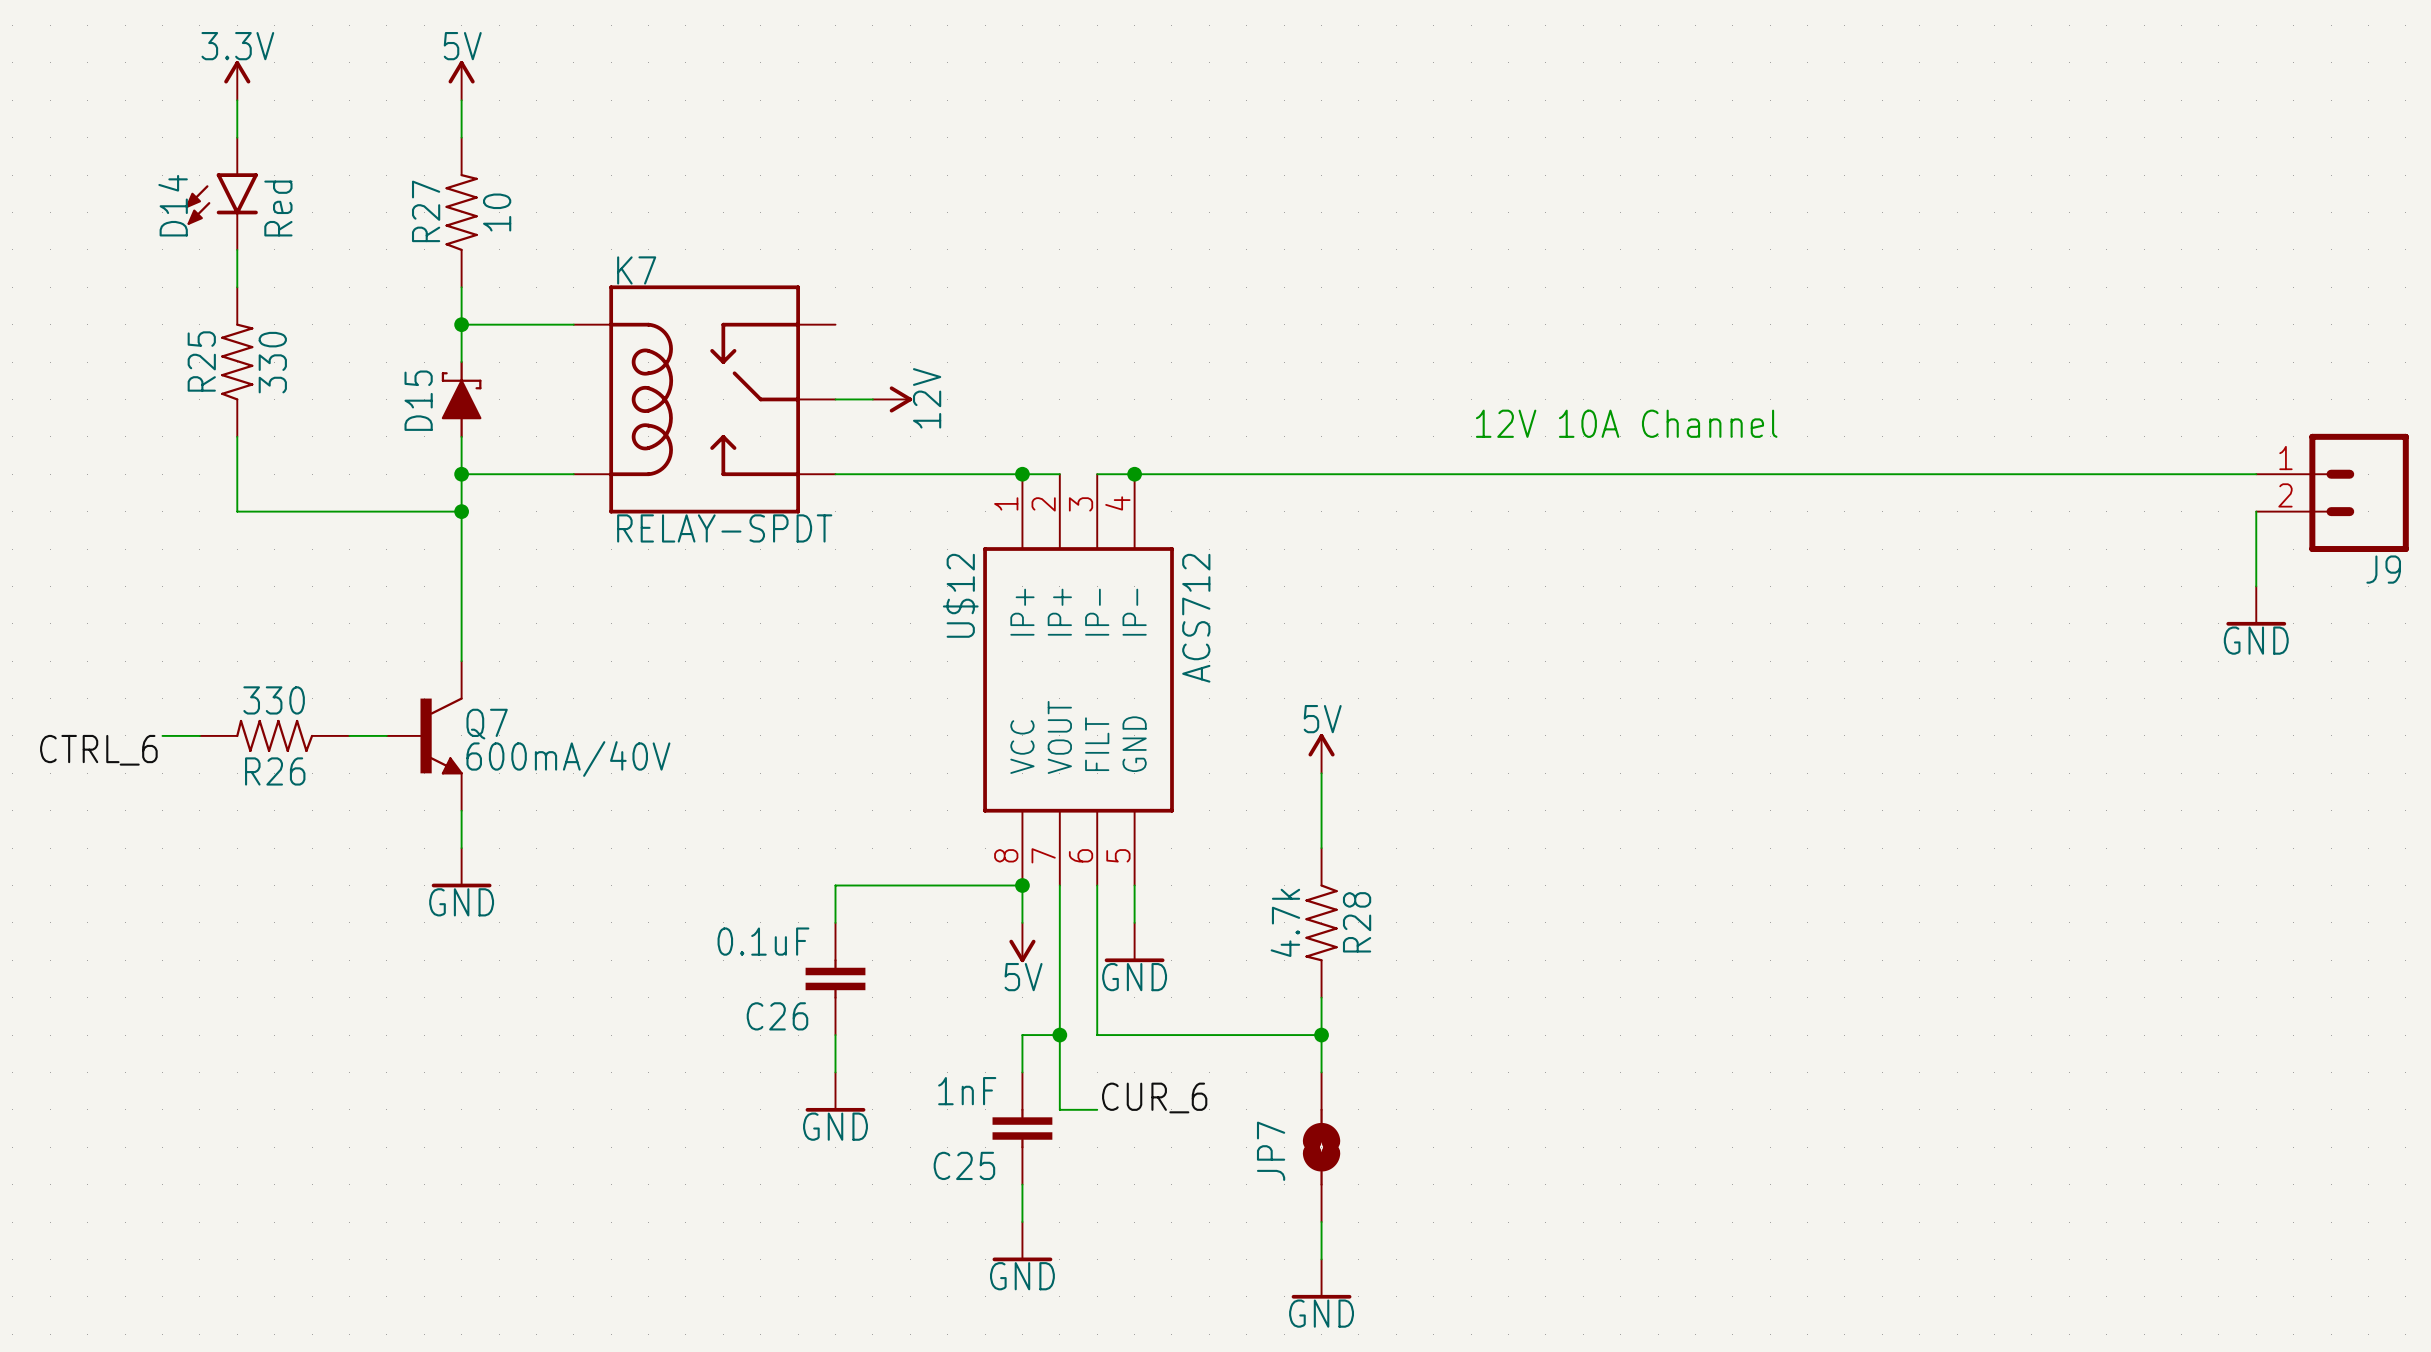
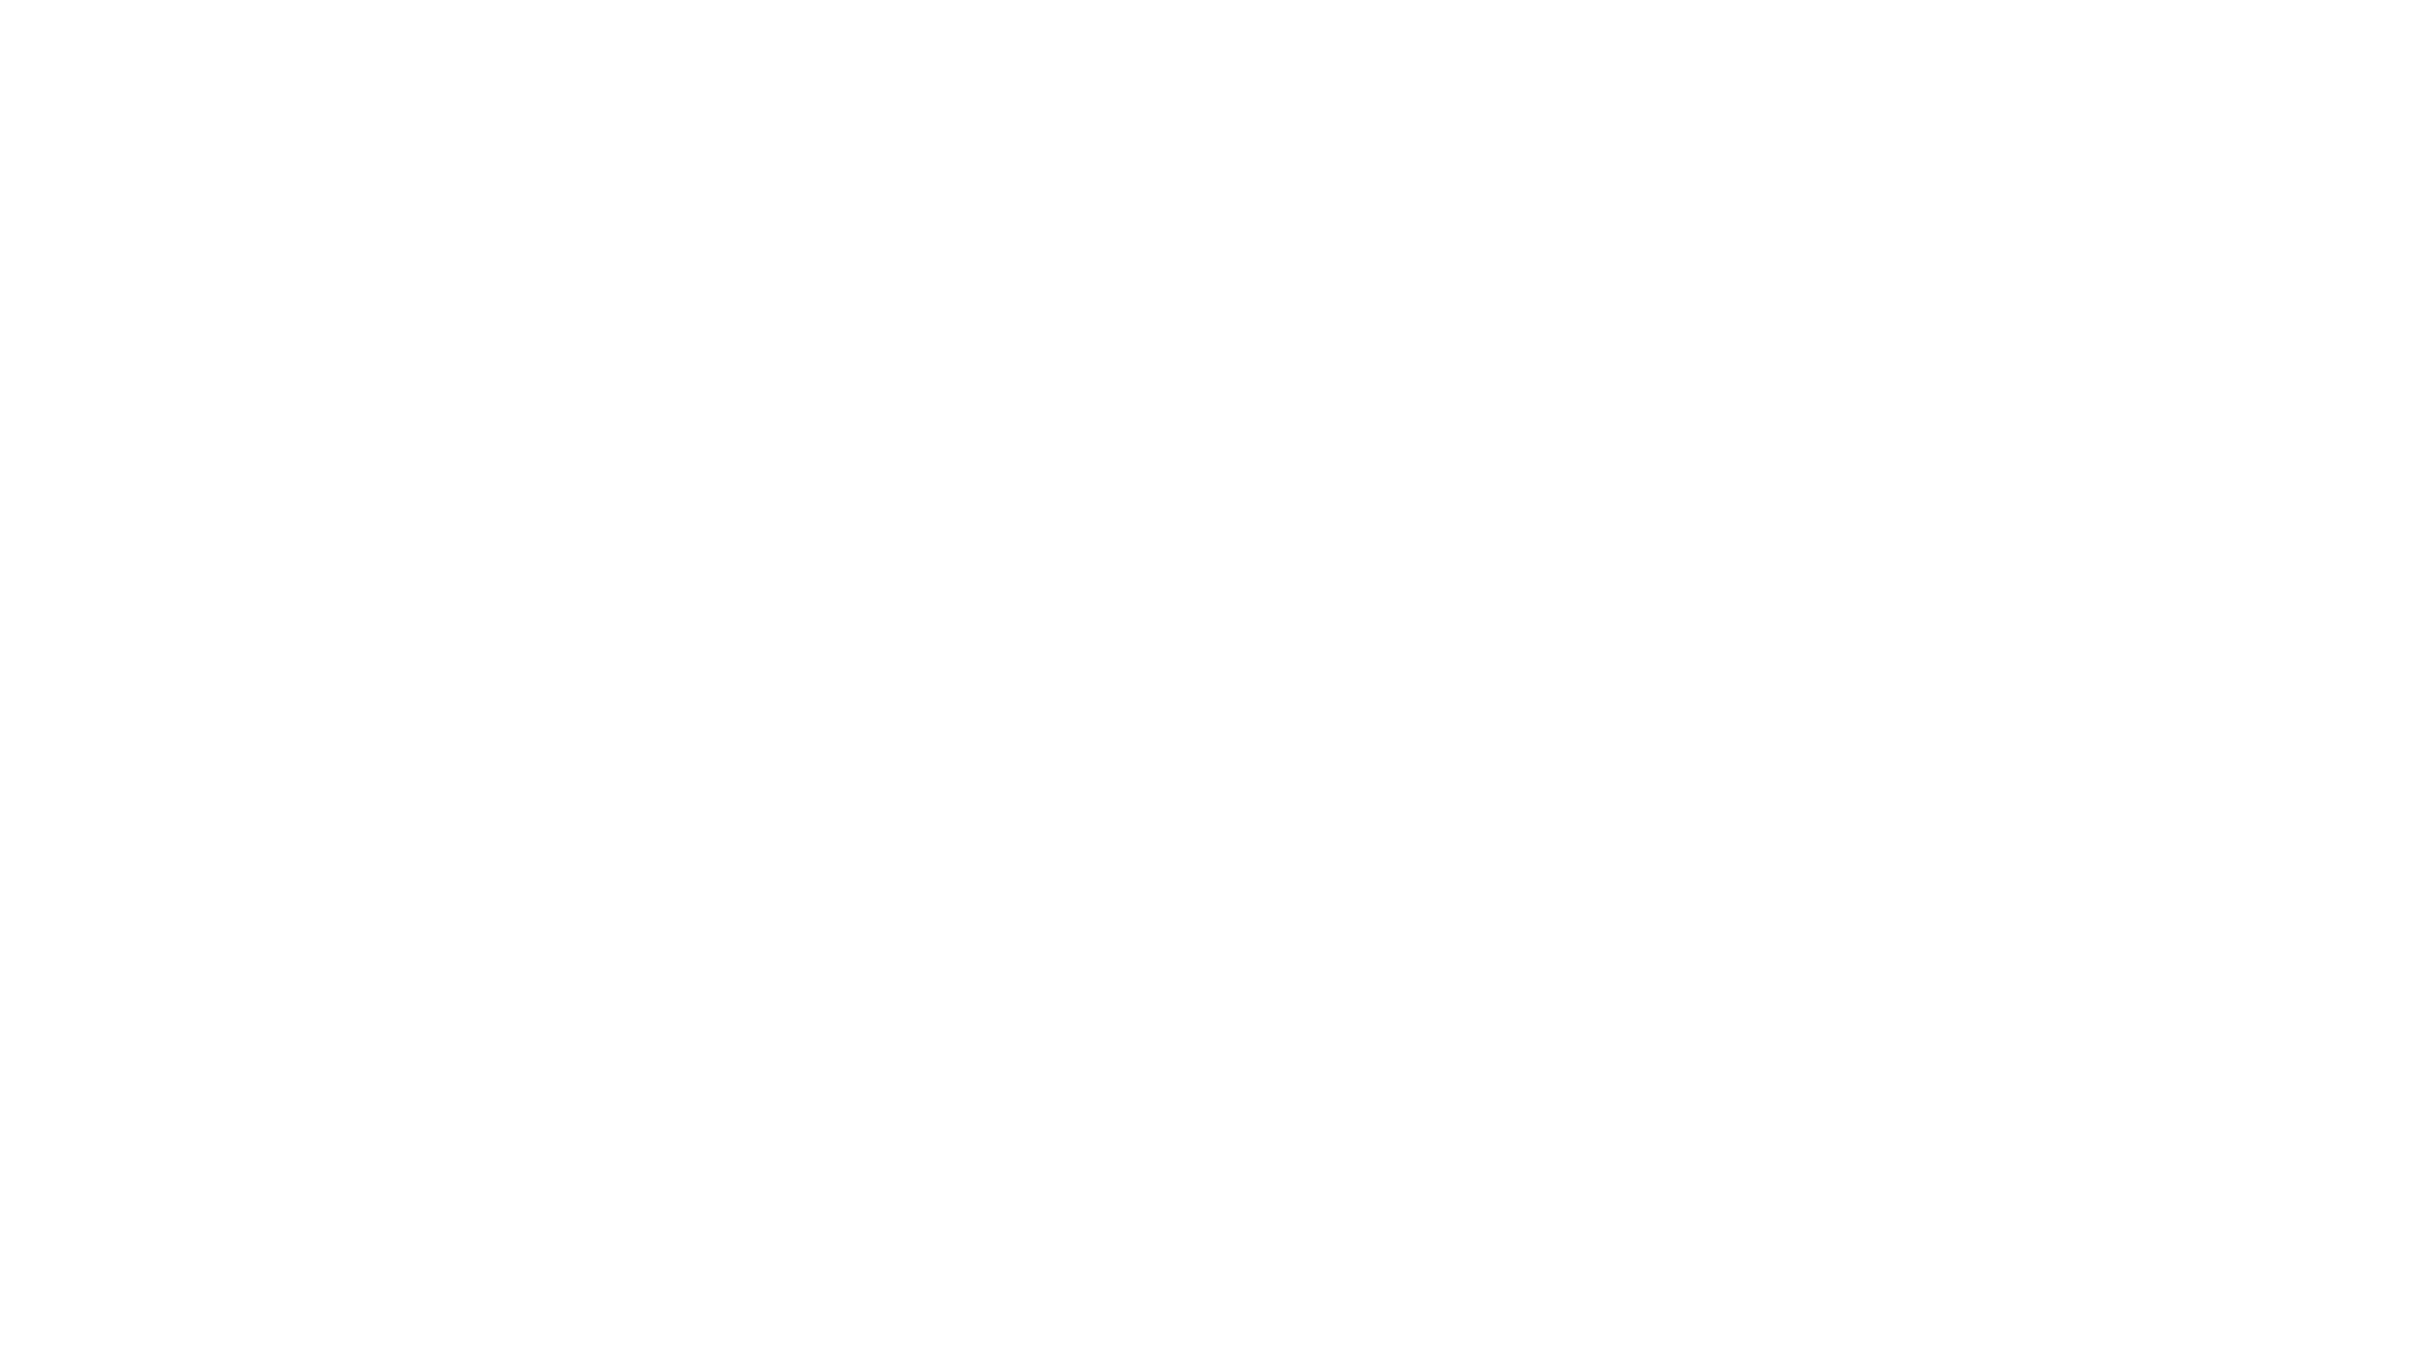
power symbol: 3.3V (237, 80) -> none
power symbol: 5V (461, 80) -> none
wire: (237, 100) (237, 137) -> none
wire: (461, 100) (461, 137) -> none
D14: Red (221, 193) -> none
R27: 10 (461, 212) -> none
wire: (237, 249) (237, 287) -> none
wire: (461, 287) (461, 362) -> none
wire: (461, 324) (573, 324) -> none
junction: (461, 324) -> none
R25: 330 (237, 362) -> none
D15: (461, 399) -> none
K7: RELAY-SPDT (704, 399) -> none
wire: (835, 399) (872, 399) -> none
power symbol: 12V (892, 399) -> none
text: 12V 10A Channel (1626, 423) -> none
wire: (237, 436) (237, 511) (461, 511) -> none
wire: (461, 436) (461, 661) -> none
wire: (461, 474) (573, 474) -> none
junction: (461, 474) -> none
wire: (835, 474) (1059, 474) -> none
junction: (1022, 474) -> none
wire: (1097, 474) (2256, 474) -> none
junction: (1134, 474) -> none
J9: (2332, 492) -> none
junction: (461, 511) -> none
wire: (2256, 511) (2256, 586) -> none
power symbol: GND (2256, 606) -> none
U$12: ACS712 (1078, 679) -> none
wire: (162, 735) (199, 735) -> none
R26: 330 (274, 735) -> none
wire: (349, 735) (386, 735) -> none
Q7: 600mA/40V (424, 735) -> none
label: CTRL_6 (98, 750) -> none
power symbol: 5V (1321, 753) -> none
wire: (1321, 773) (1321, 848) -> none
wire: (461, 810) (461, 848) -> none
power symbol: GND (461, 867) -> none
junction: (1022, 885) -> none
wire: (1059, 885) (1059, 1109) (1097, 1109) -> none
wire: (1097, 885) (1097, 1035) (1321, 1035) -> none
wire: (1134, 885) (1134, 922) -> none
wire: (835, 922) (835, 885) (1022, 885) (1022, 922) -> none
R28: 4.7k (1321, 922) -> none
power symbol: 5V (1022, 942) -> none
power symbol: GND (1134, 942) -> none
C26: 0.1uF (835, 978) -> none
wire: (1321, 997) (1321, 1072) -> none
wire: (835, 1035) (835, 1072) -> none
wire: (1059, 1035) (1022, 1035) (1022, 1072) -> none
junction: (1059, 1035) -> none
junction: (1321, 1035) -> none
power symbol: GND (835, 1092) -> none
label: CUR_6 (1154, 1097) -> none
C25: 1nF (1022, 1128) -> none
JP7: (1321, 1147) -> none
wire: (1022, 1184) (1022, 1222) -> none
wire: (1321, 1222) (1321, 1259) -> none
power symbol: GND (1022, 1241) -> none
power symbol: GND (1321, 1279) -> none

